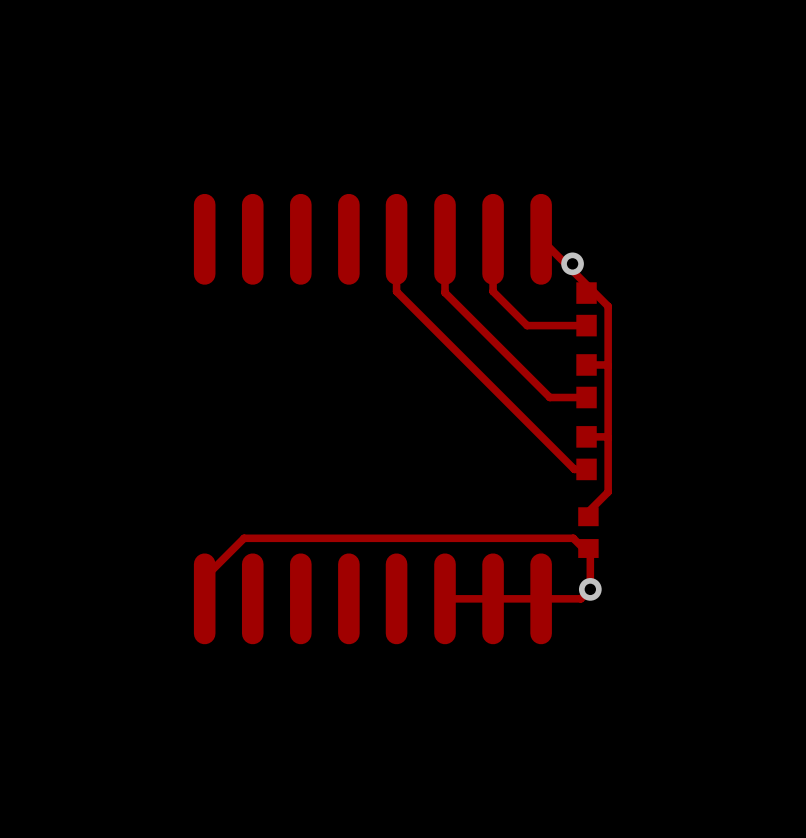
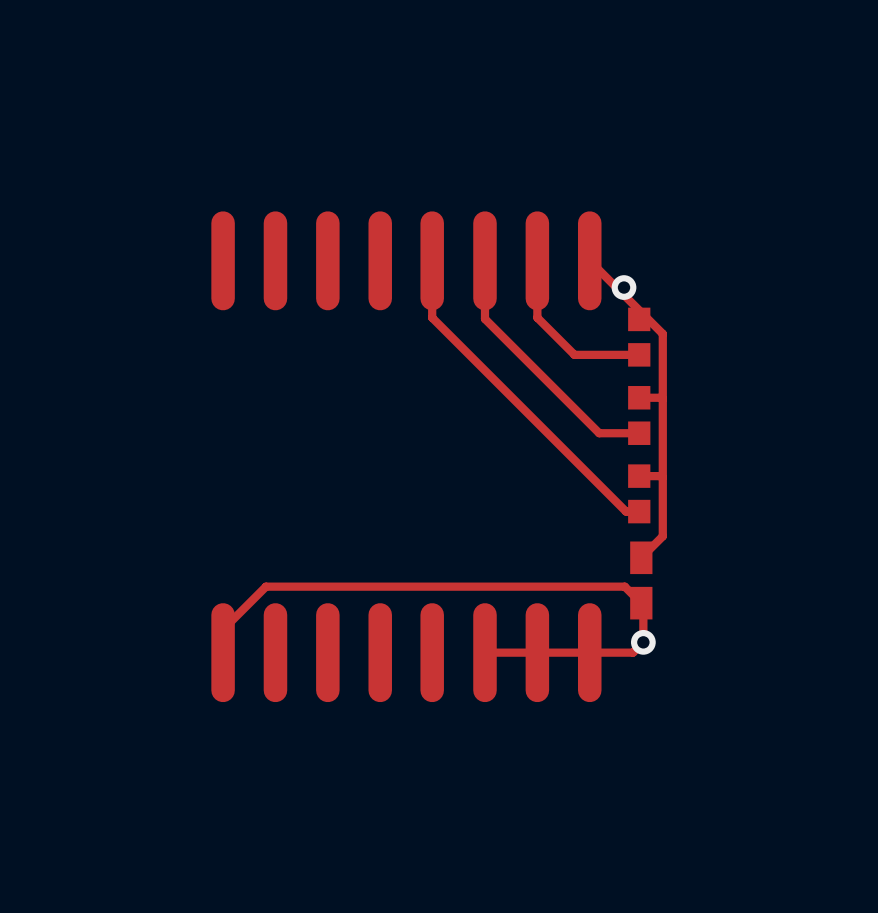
part footprint: [578, 507, 599, 558] -> [630, 541, 653, 620]

